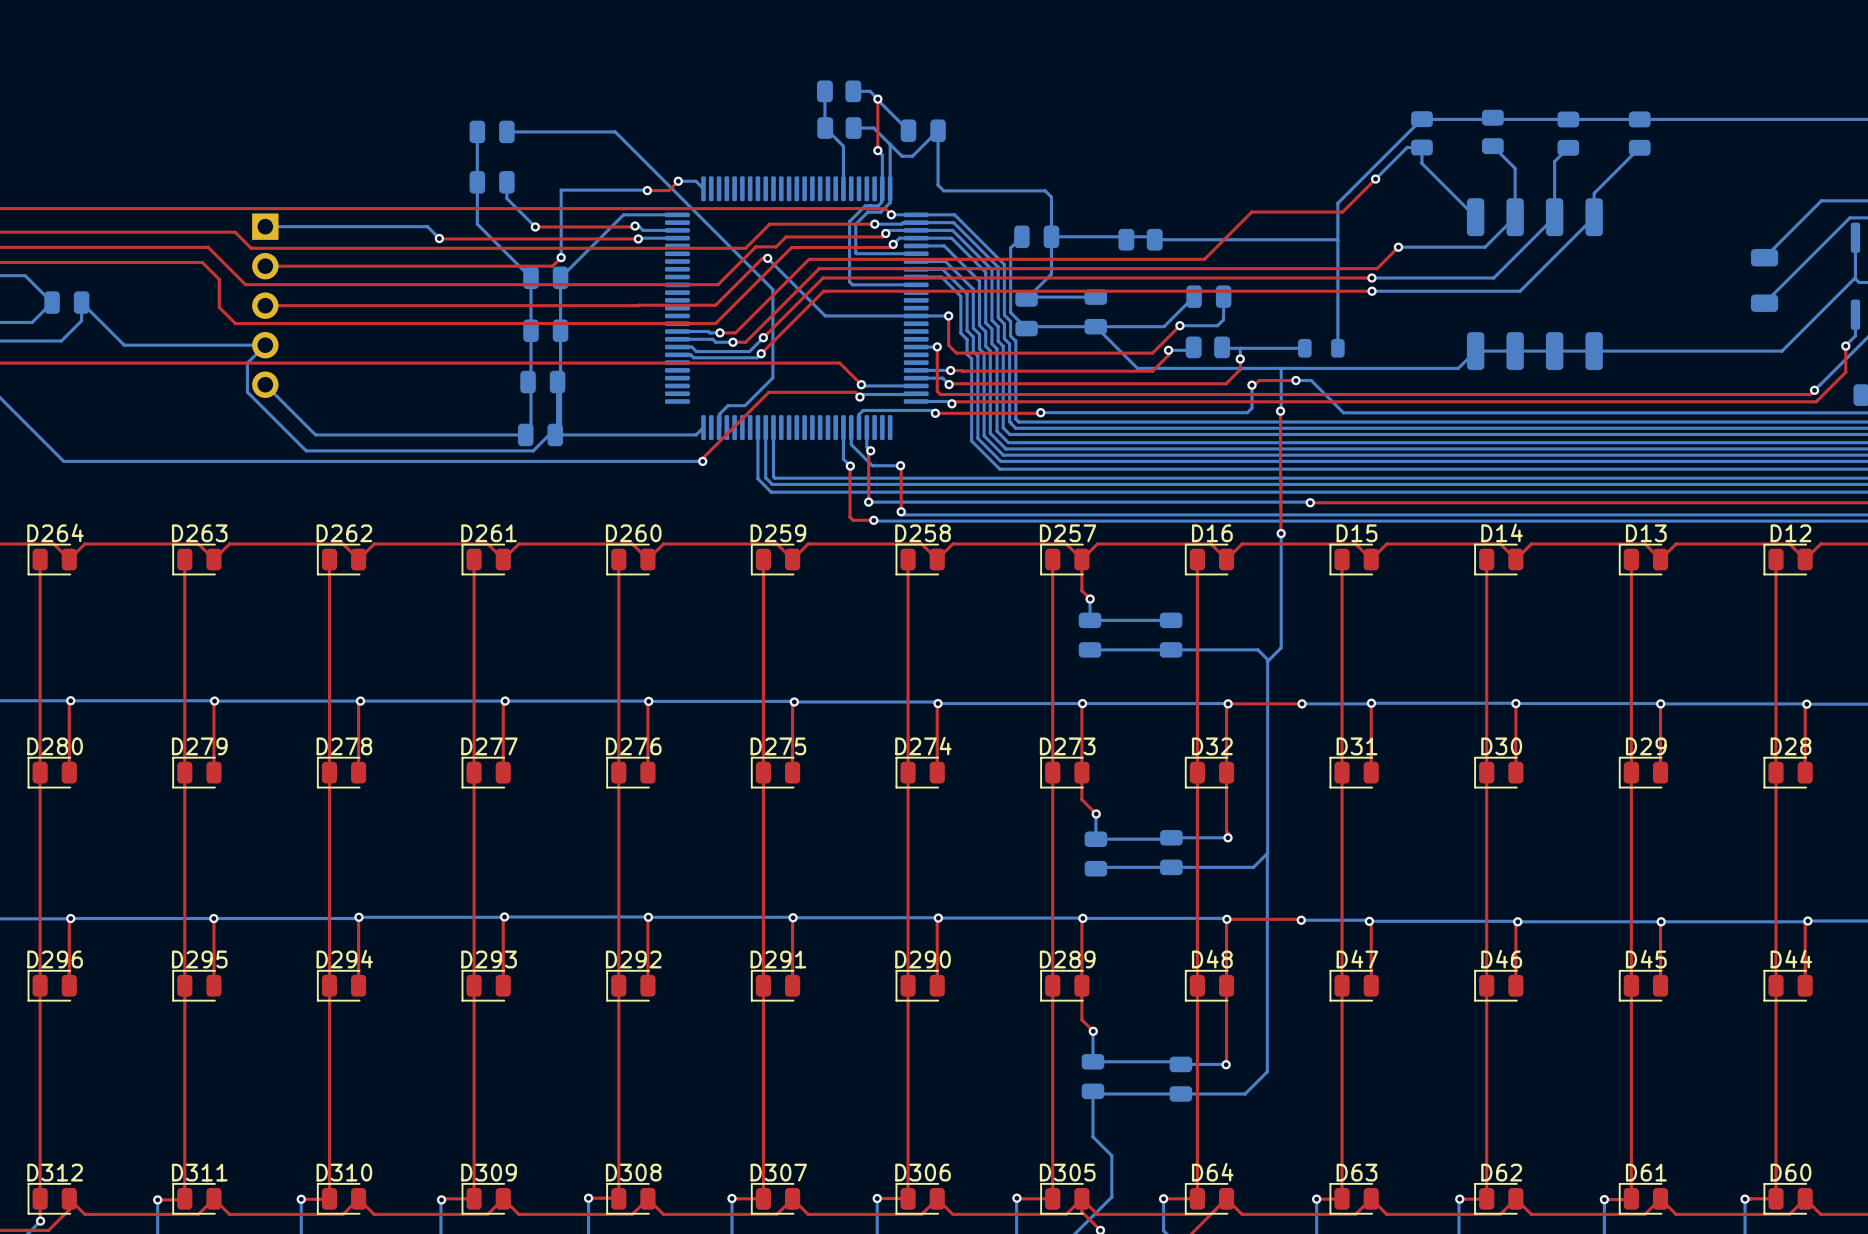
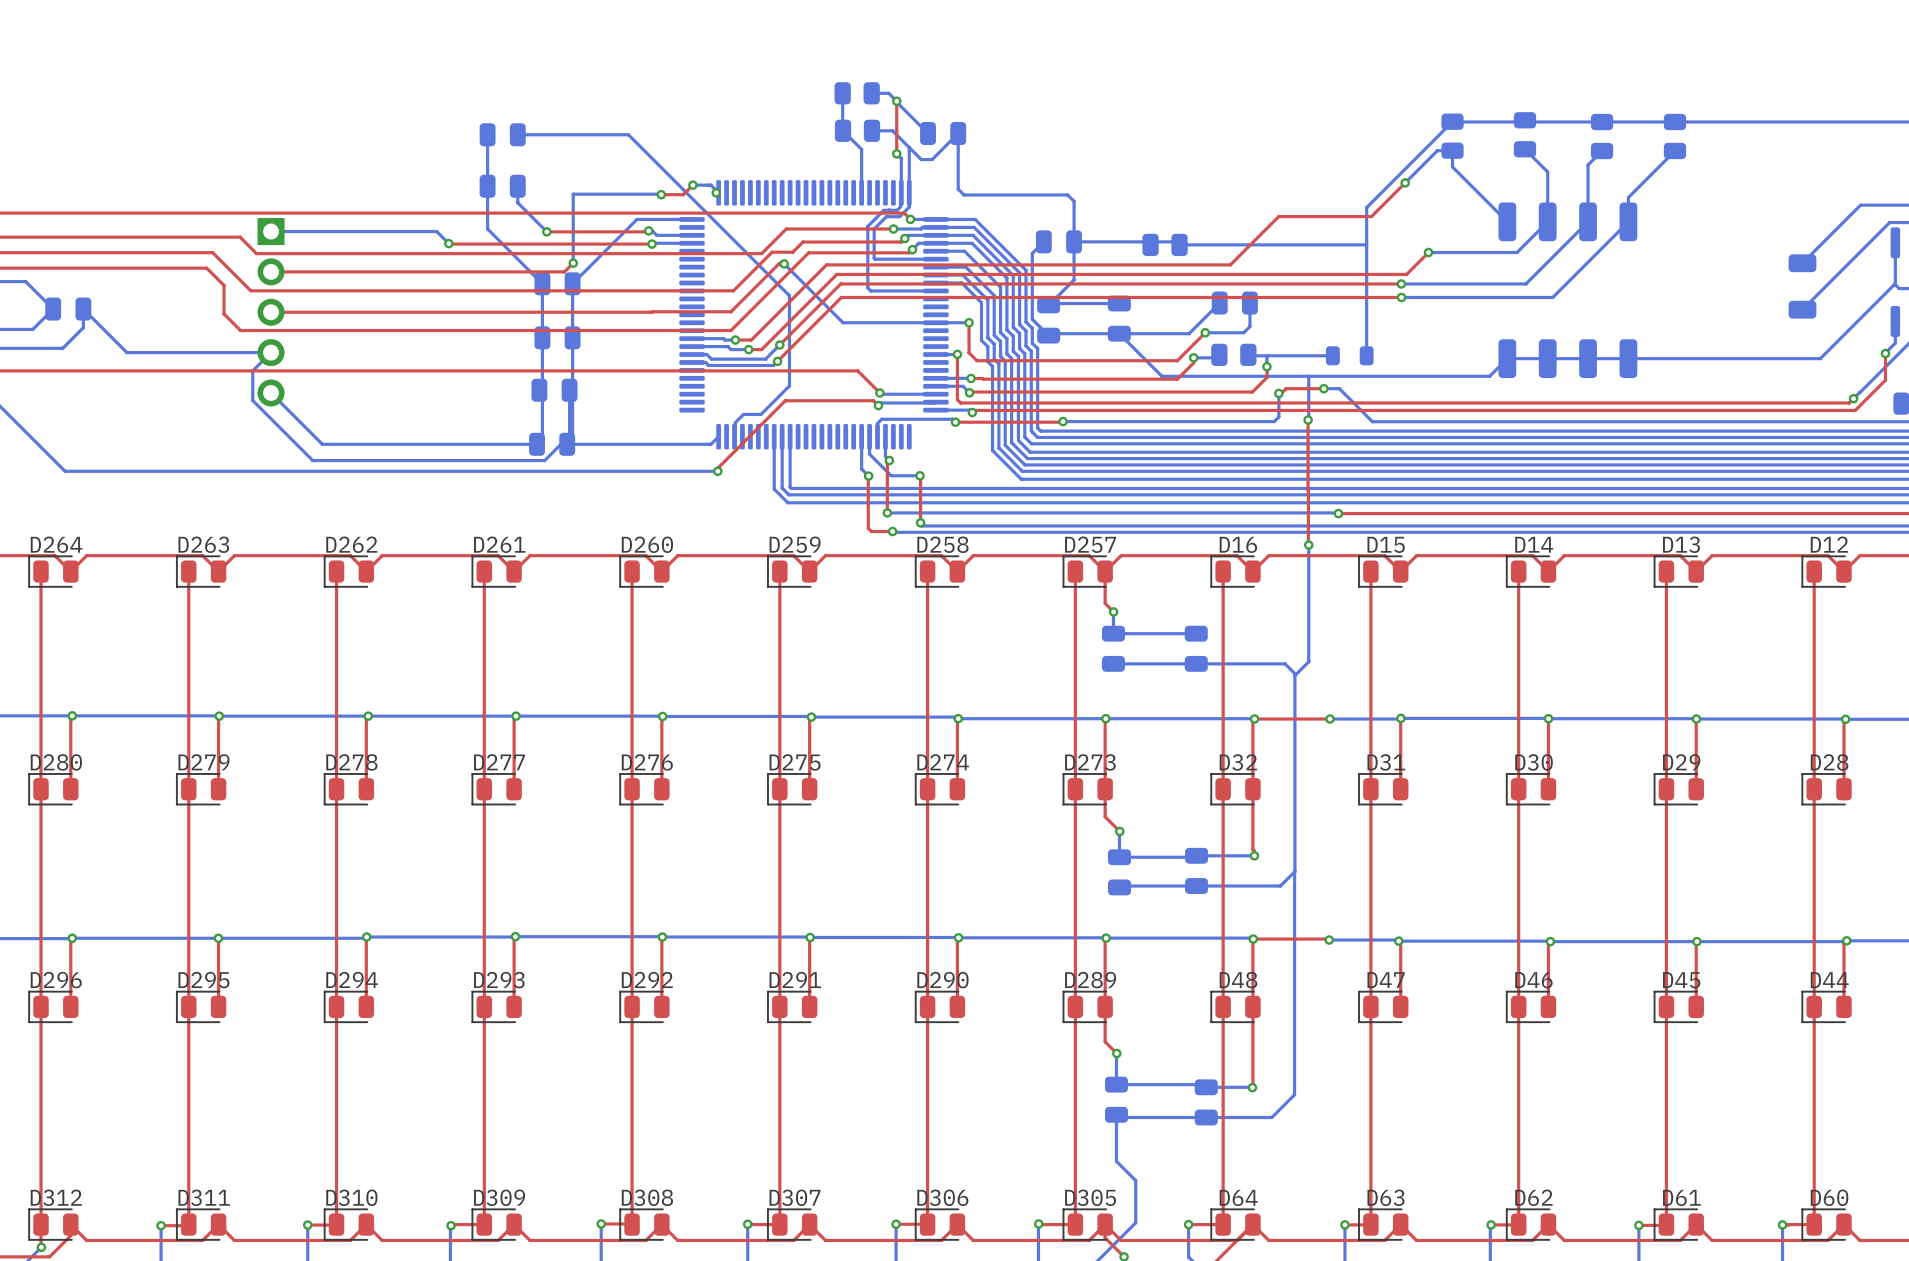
via: none -> (716, 192)

